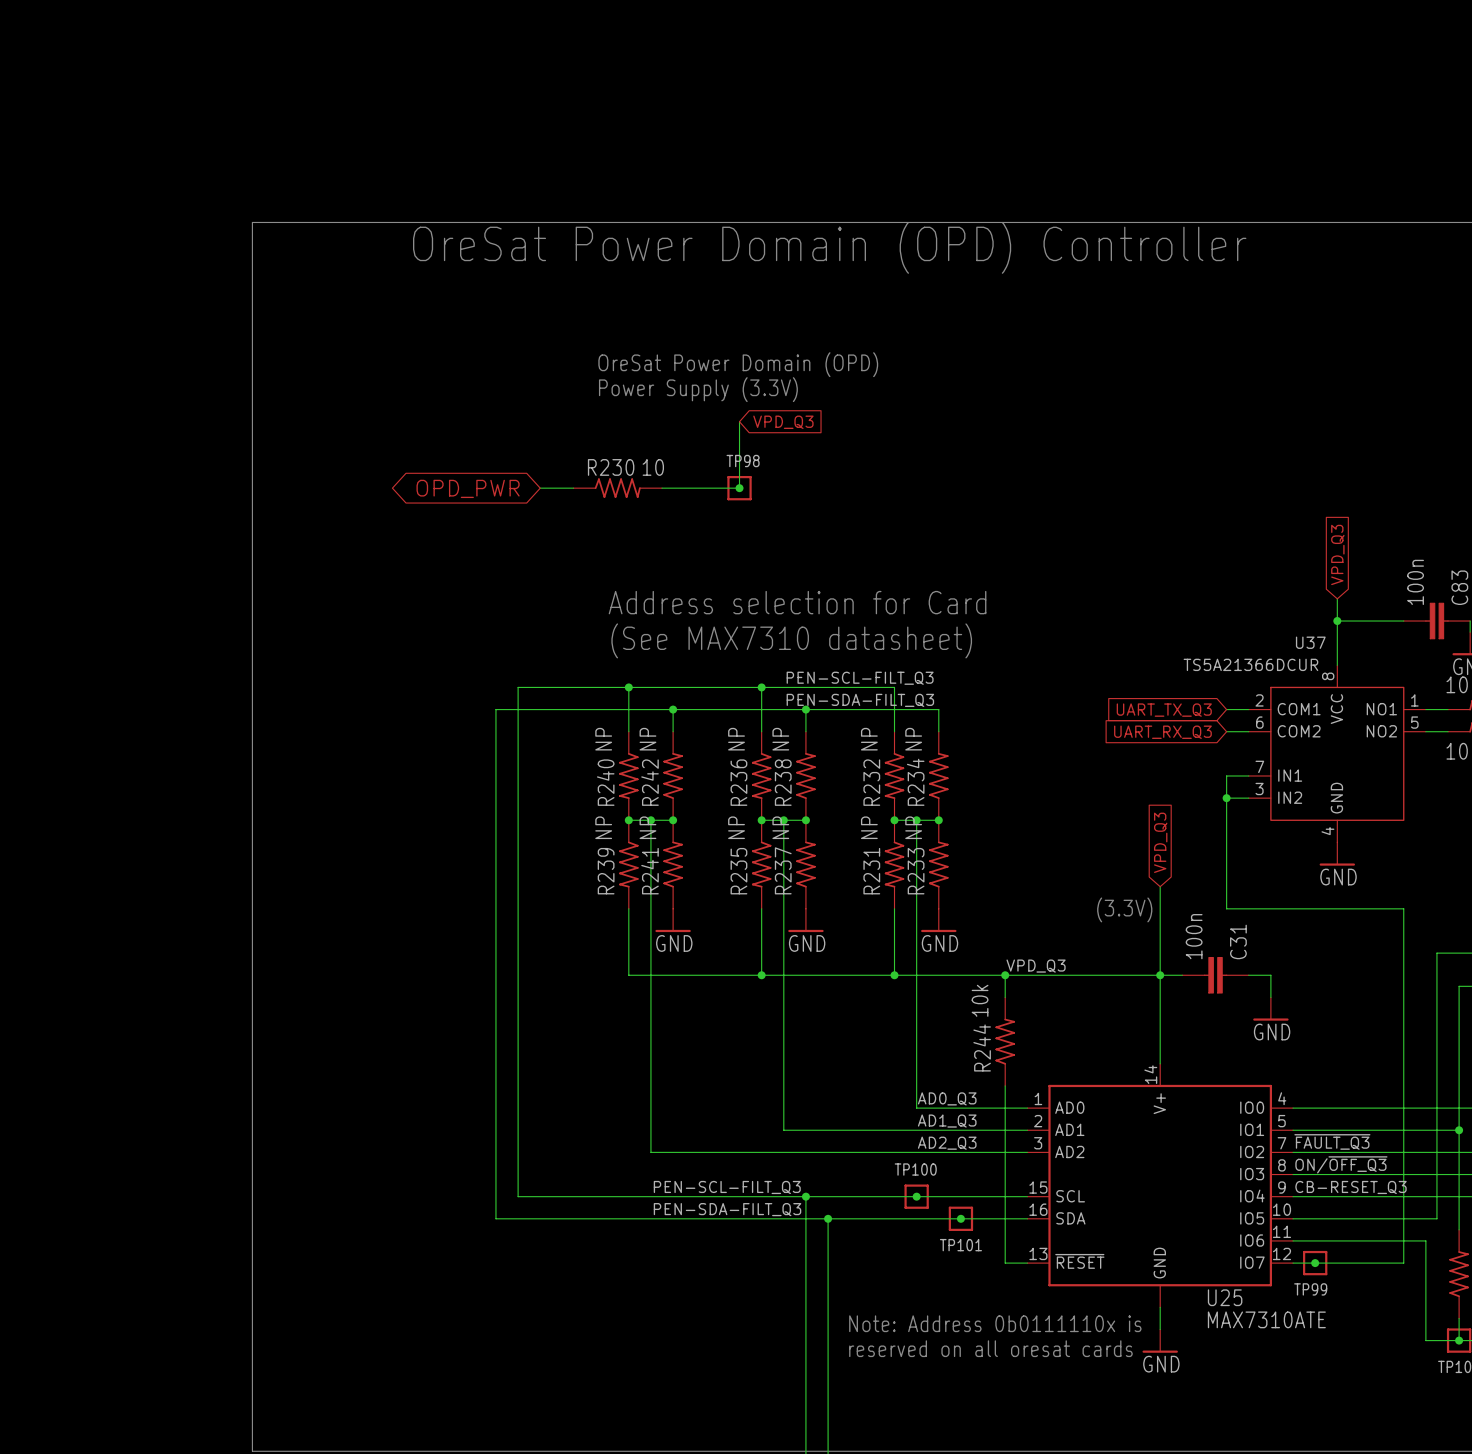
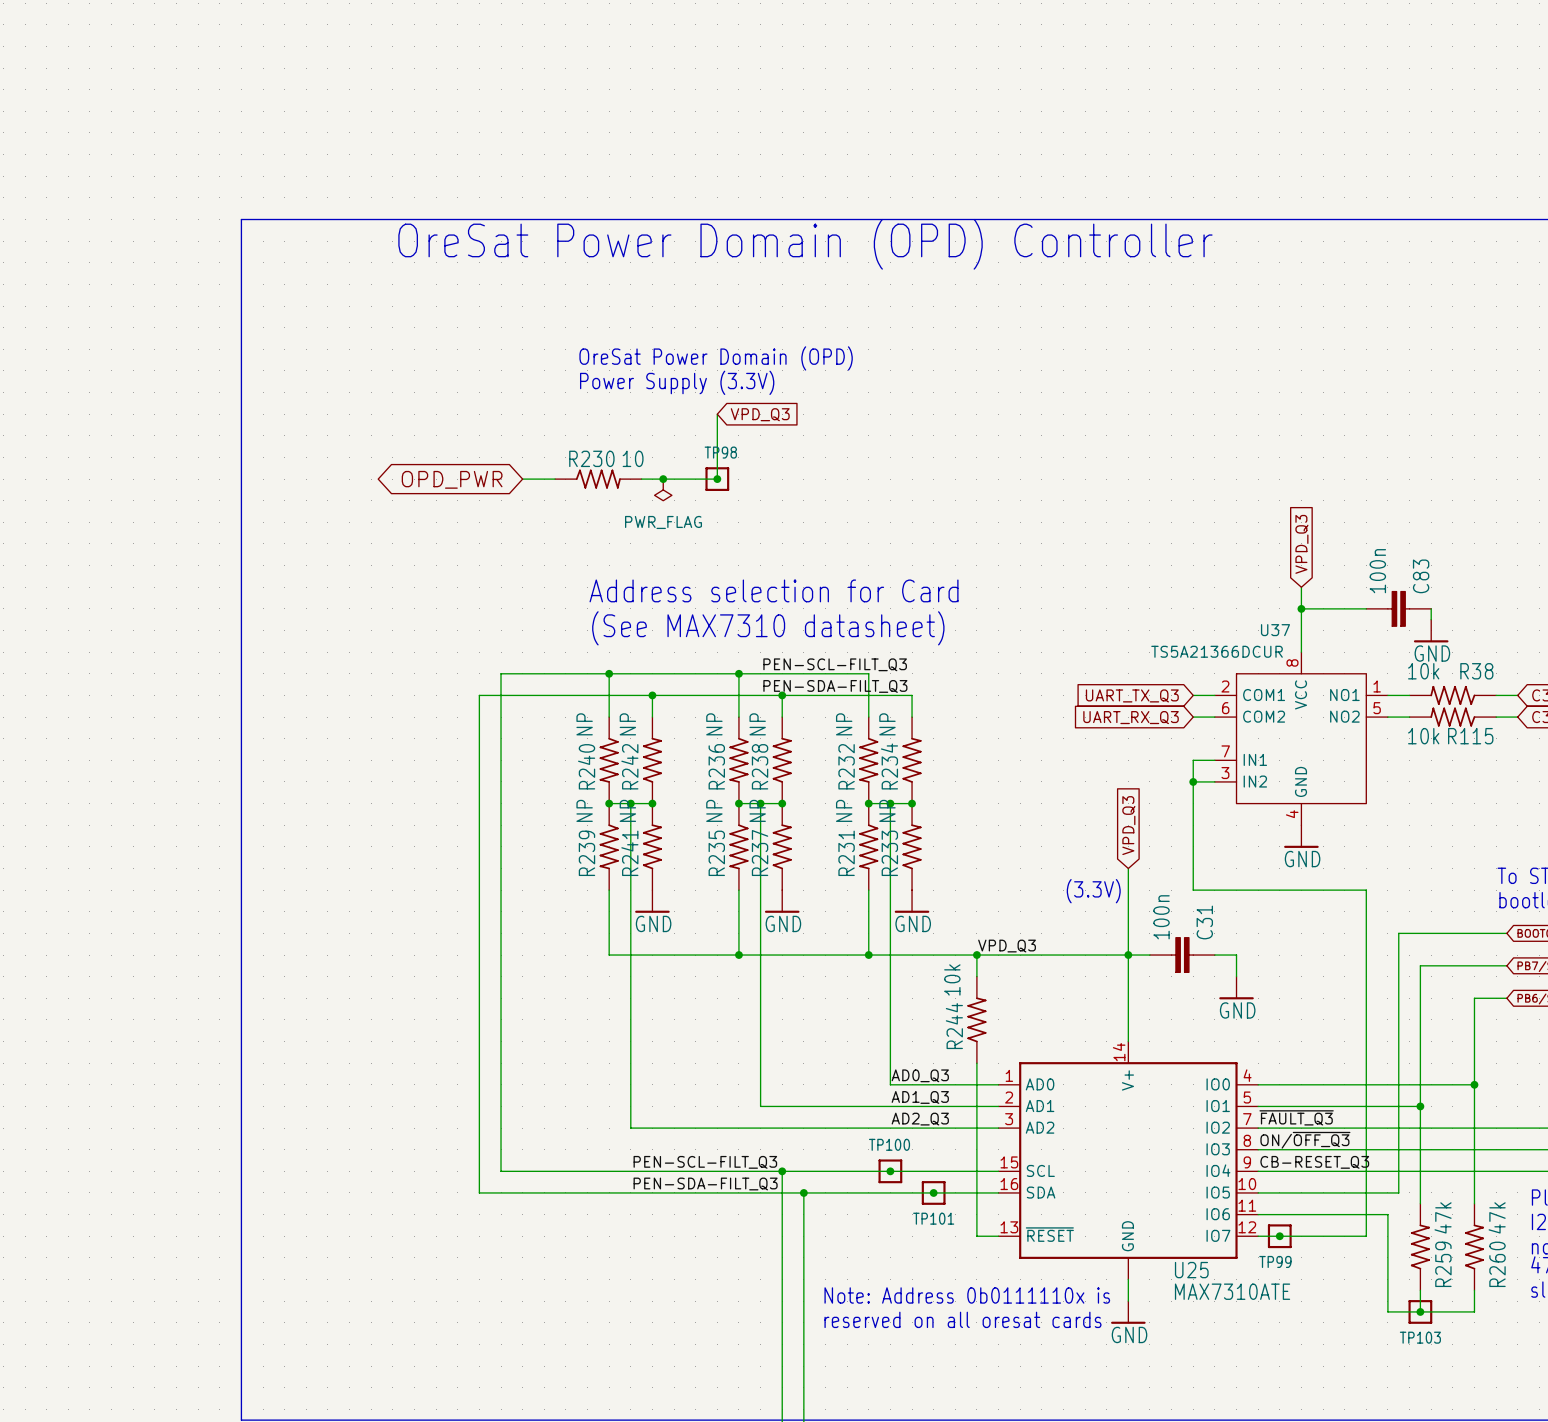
junction: none -> (663, 479)
power symbol: none -> PWR_FLAG (663, 489)

